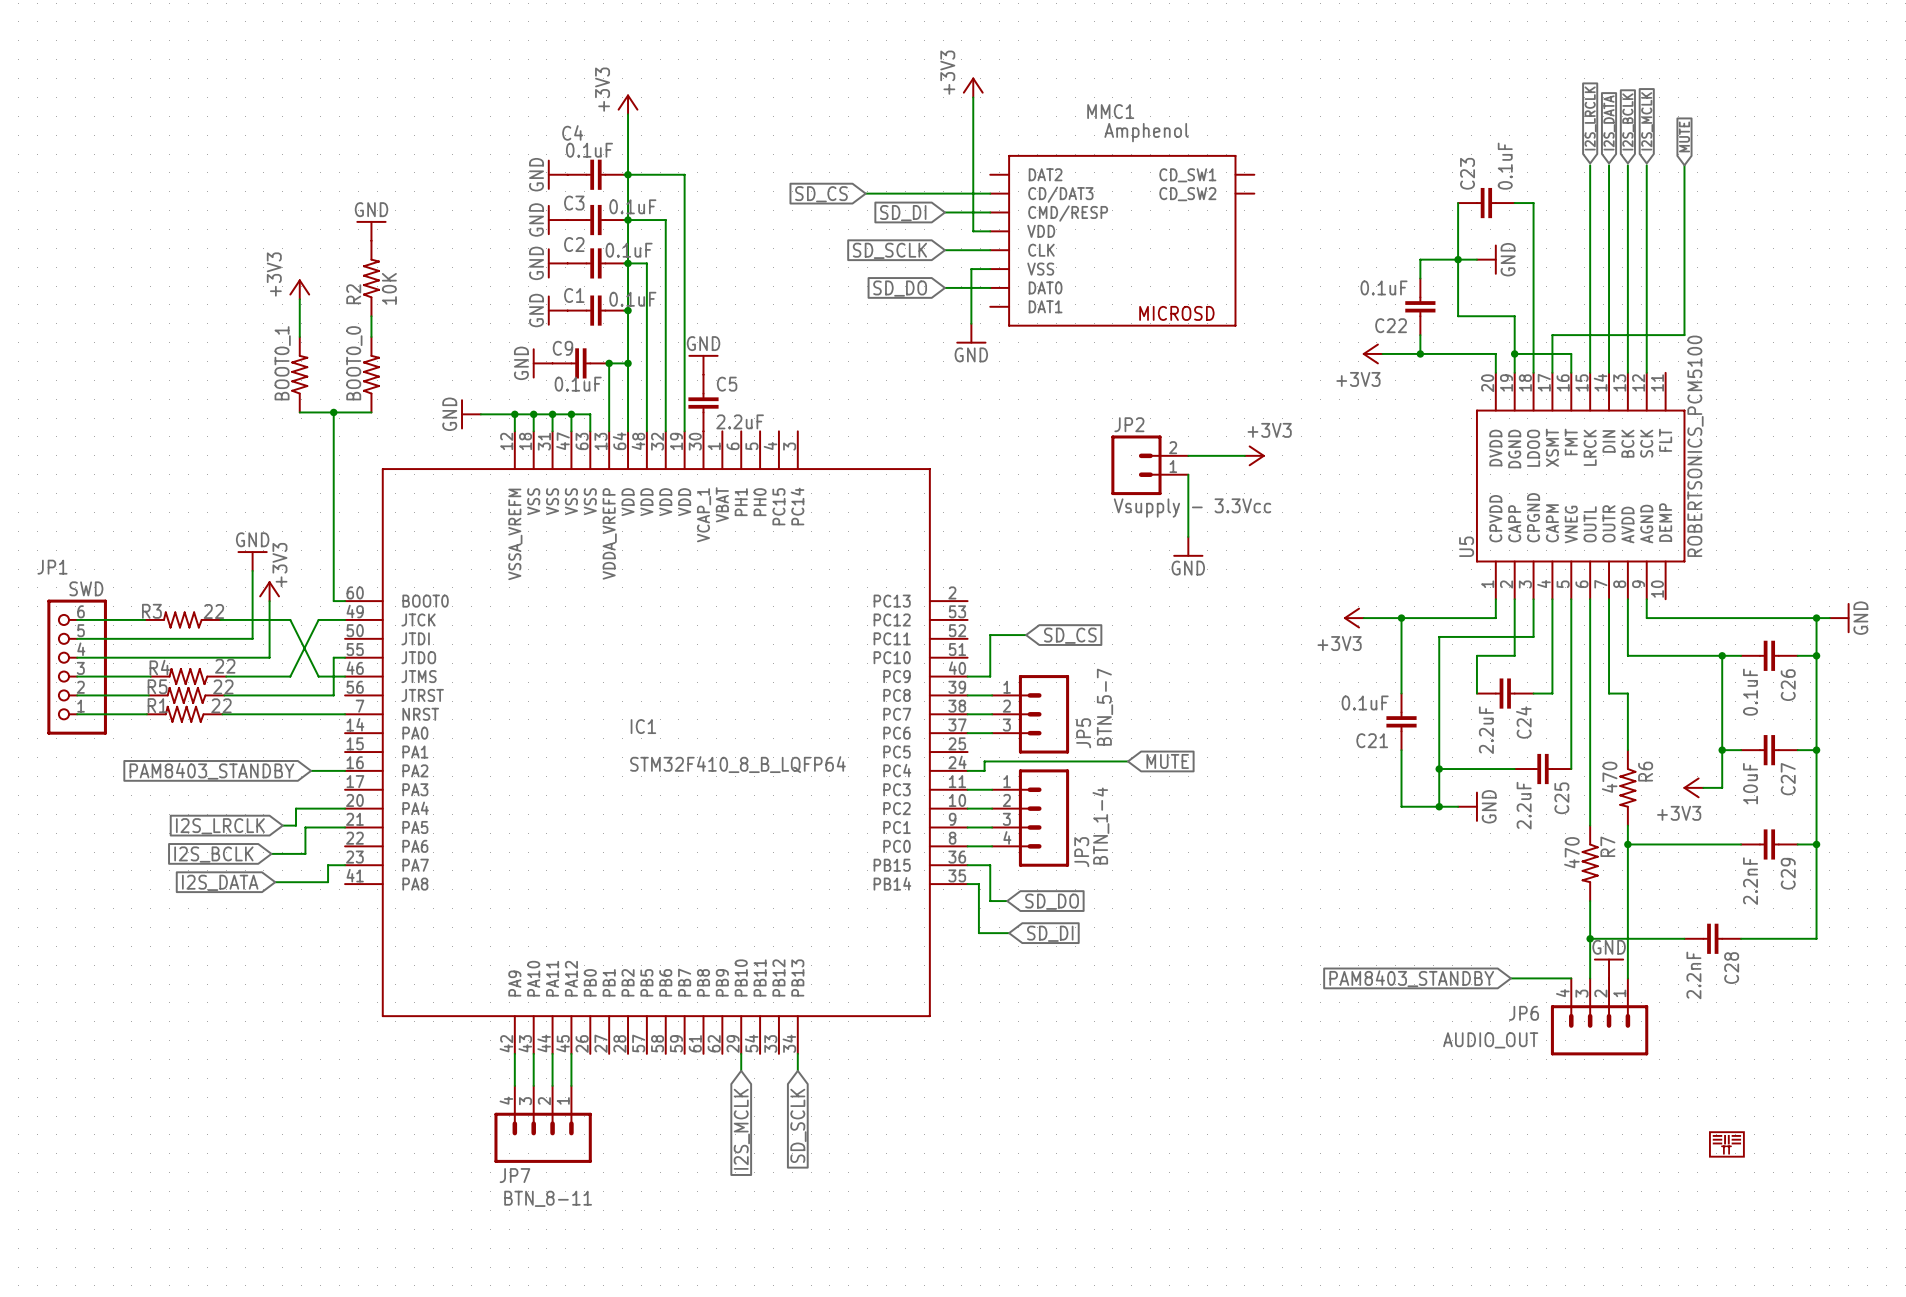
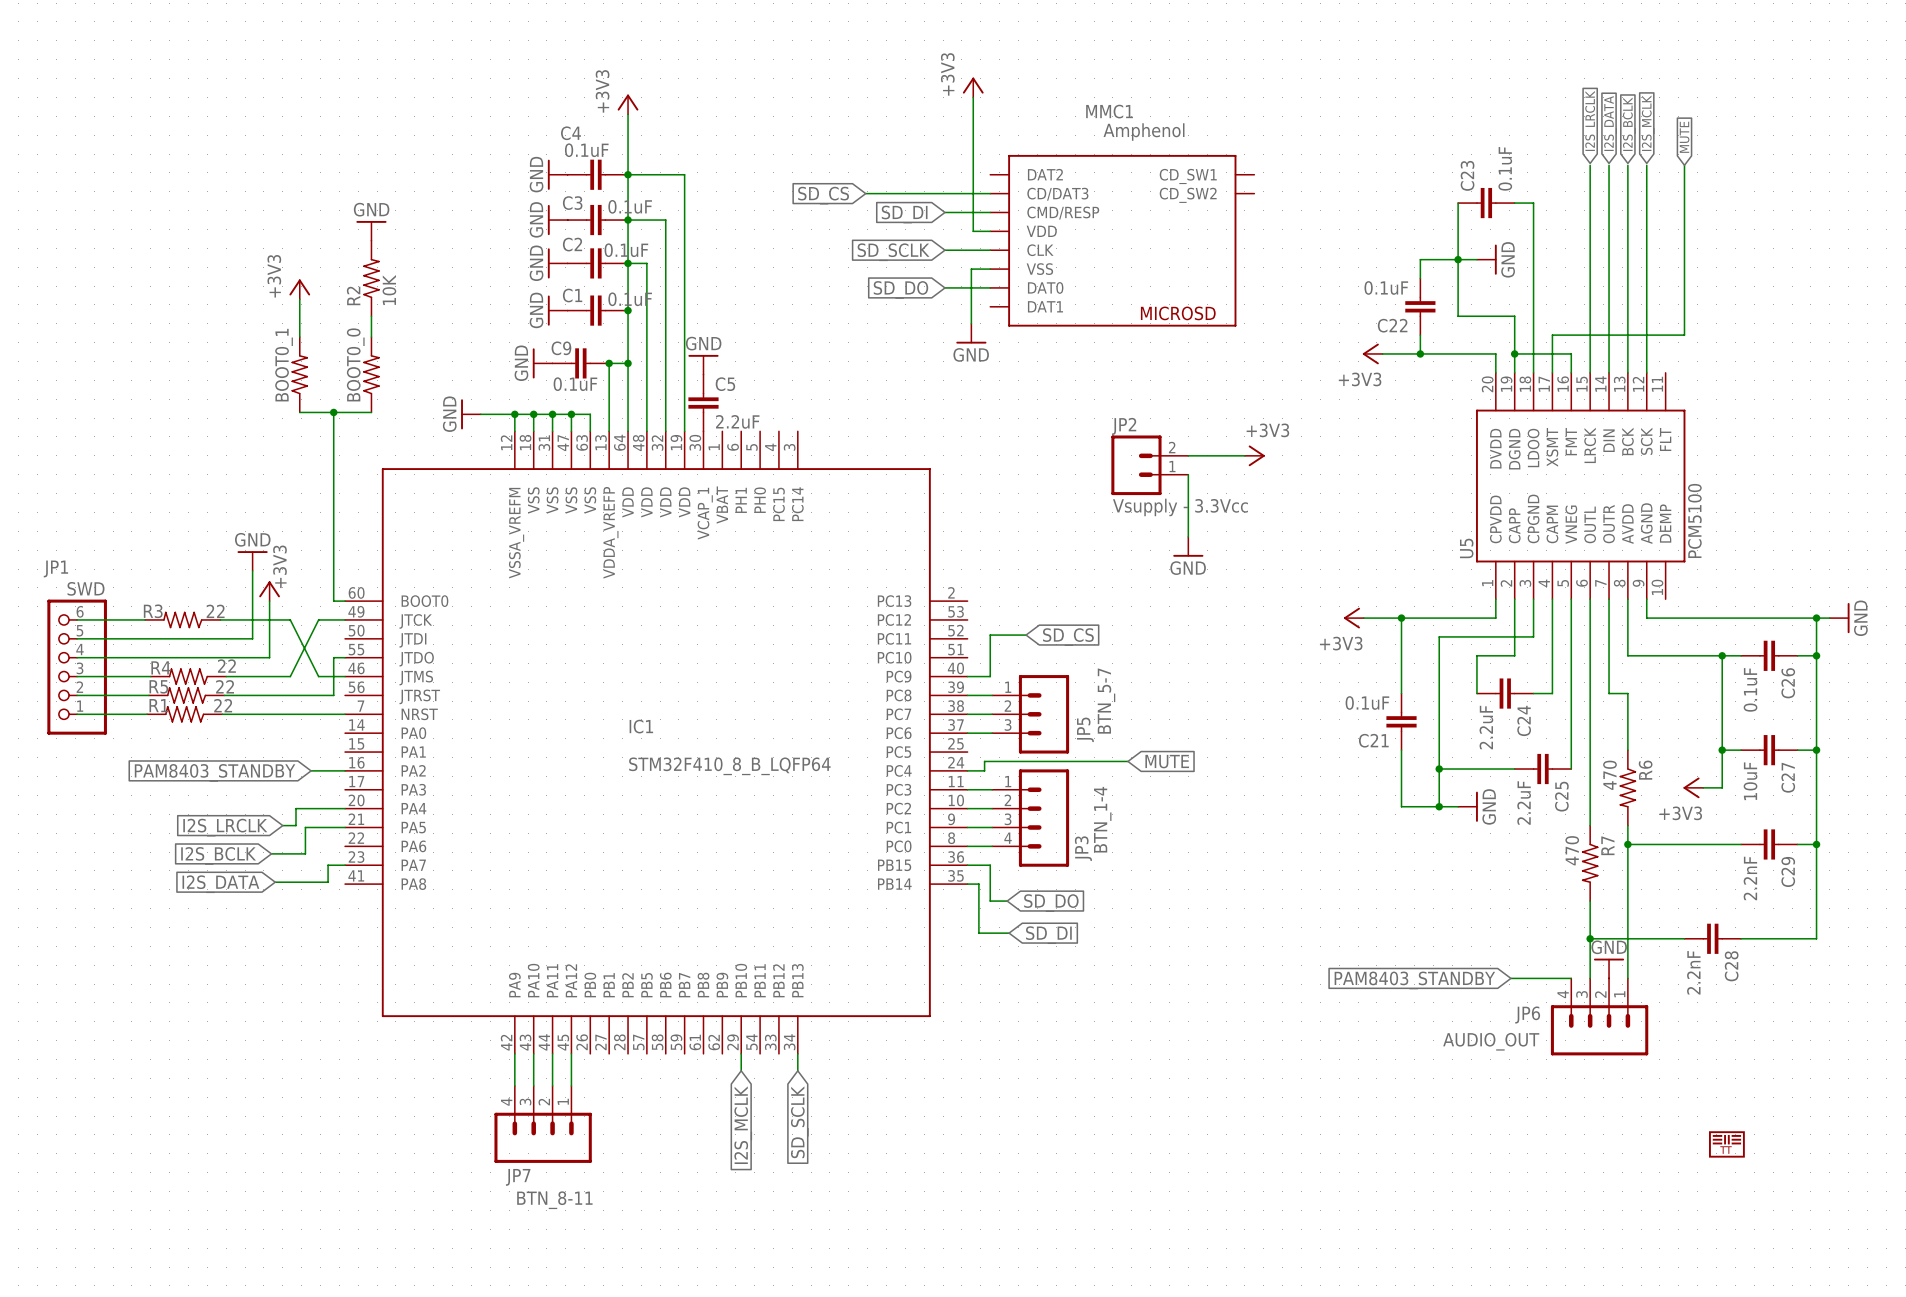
U5 value: ROBERTSONICS_PCM5100 (1695, 446) -> PCM5100 (1694, 520)

